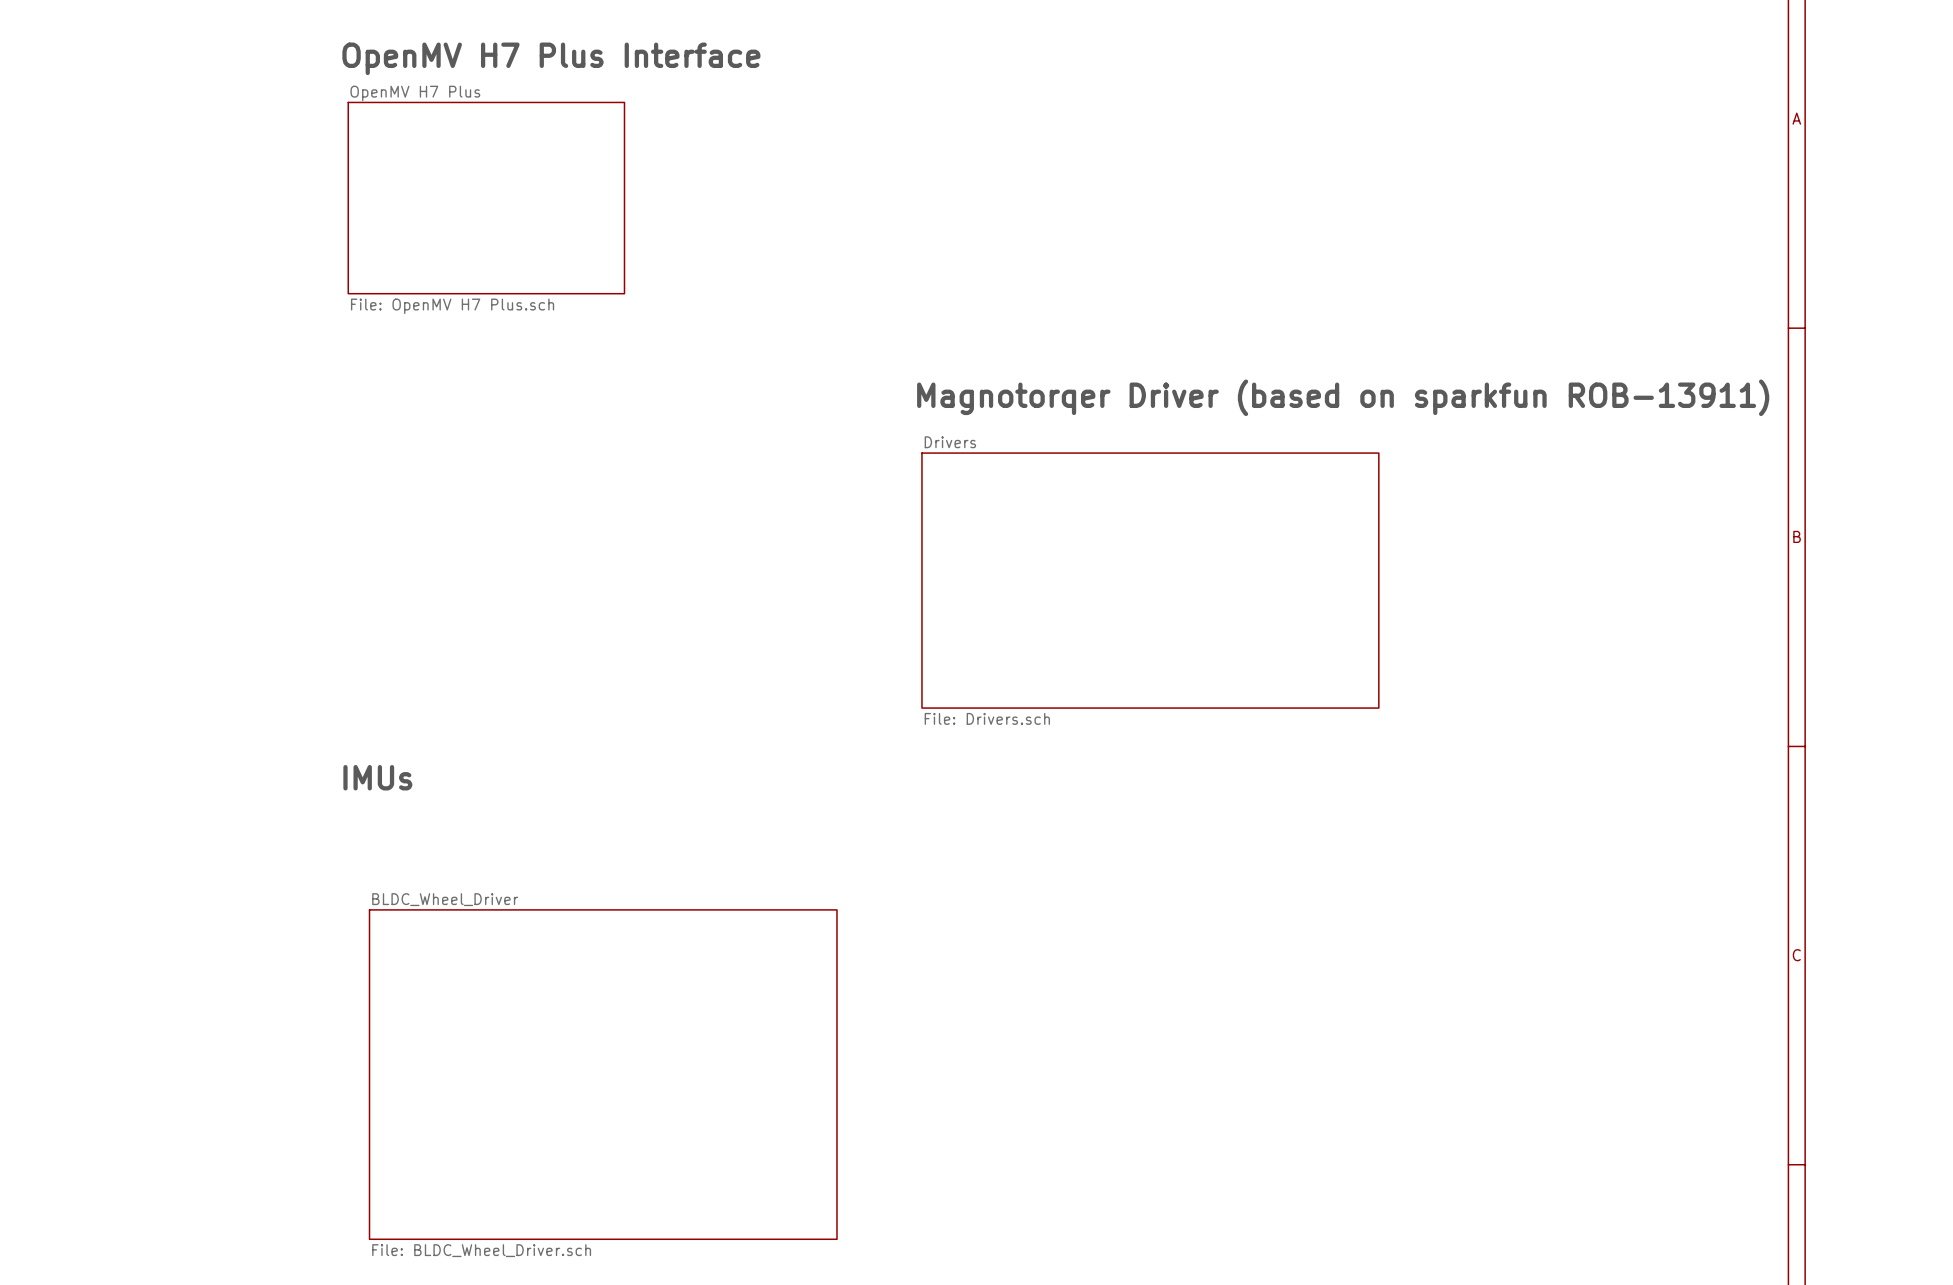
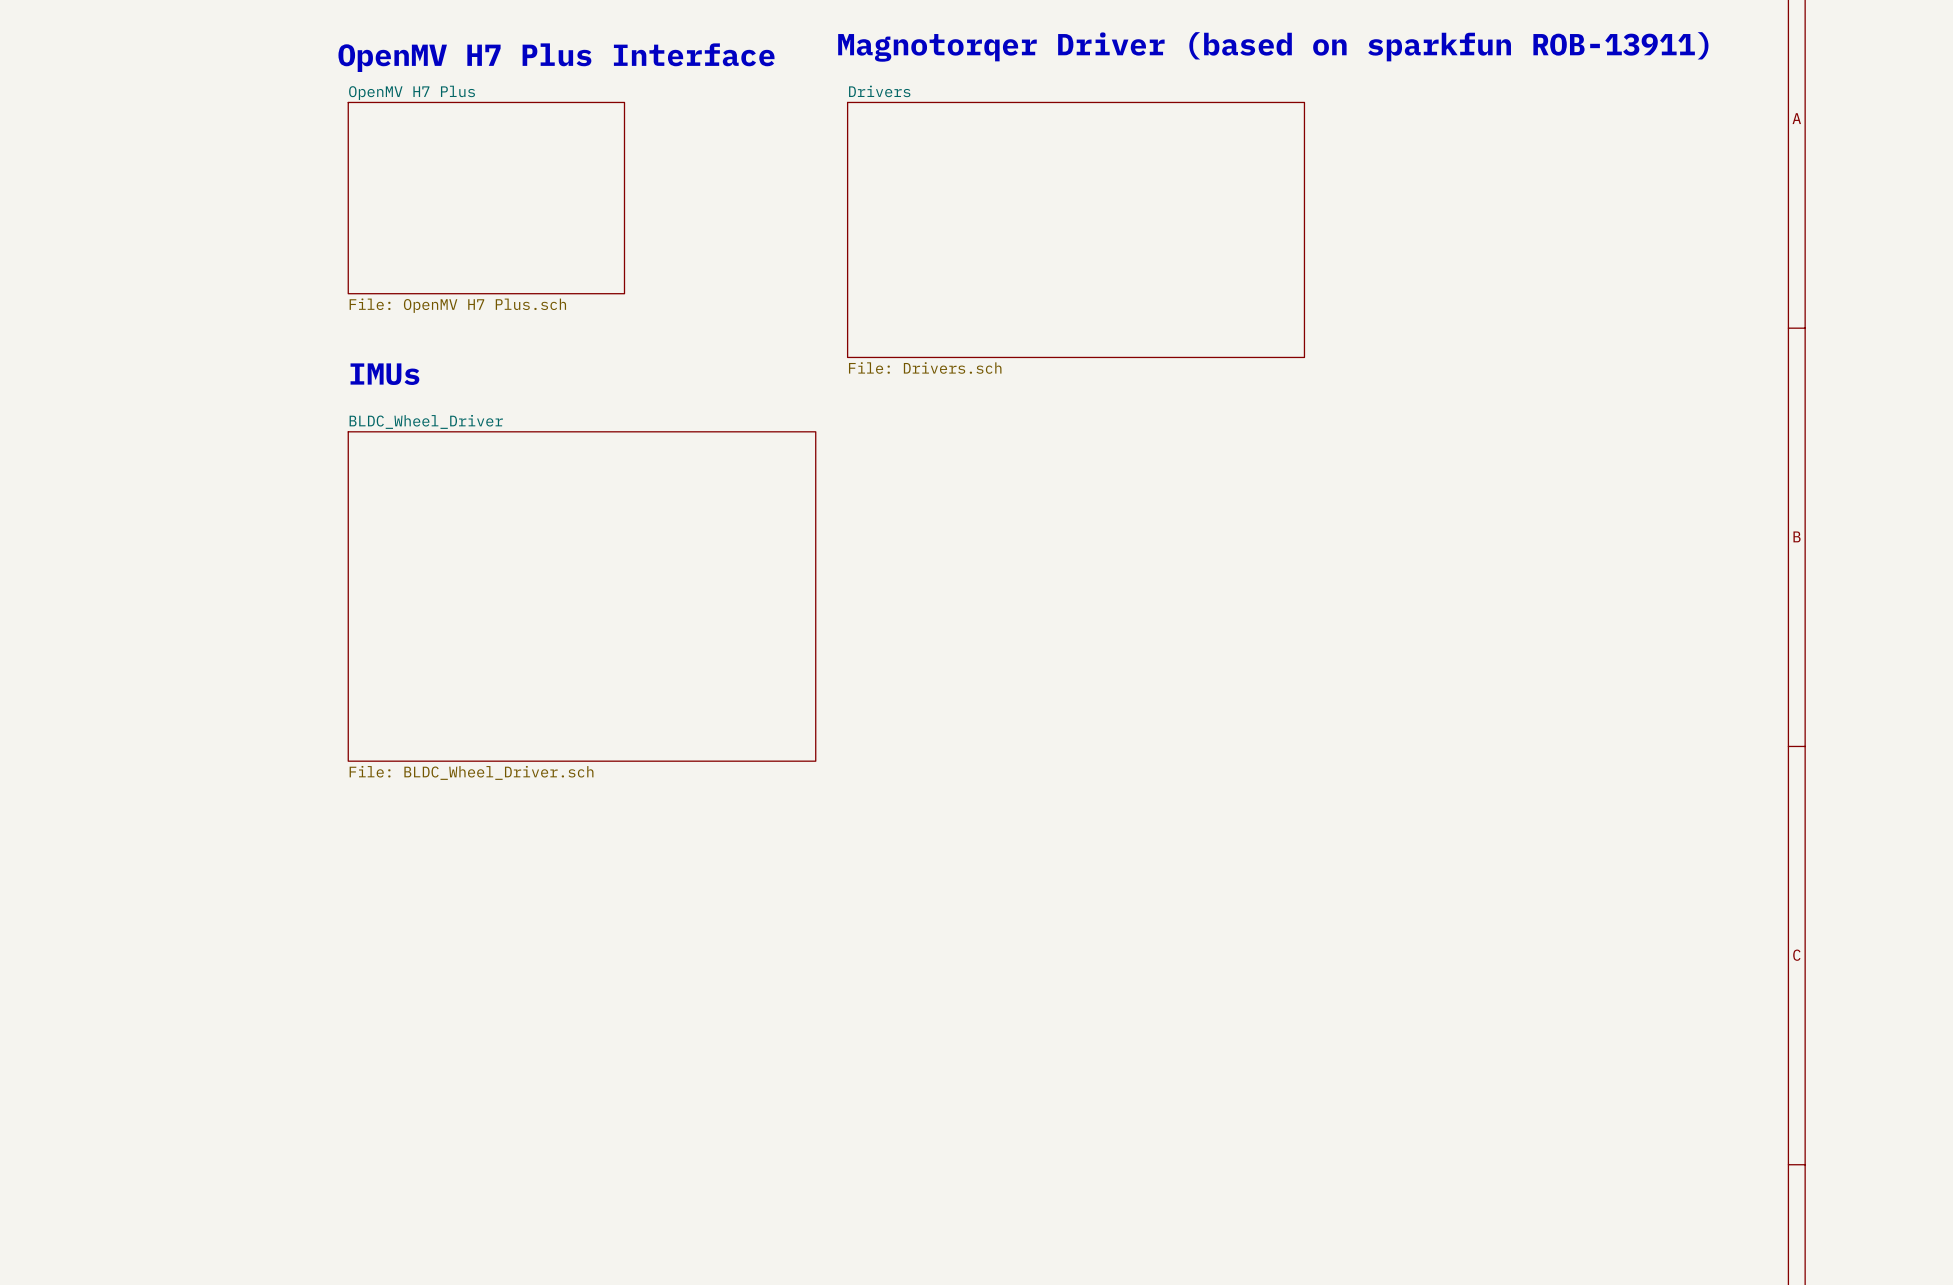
text: none -> Magnotorqer Driver (based on sparkfun ROB-13911) (1273, 46)
sheet Drivers: none -> File: Drivers.sch (1076, 229)
text: none -> IMUs (384, 374)
text: Magnotorqer Driver (based on sparkfun ROB-13911) (1343, 397) -> none
sheet Drivers: File: Drivers.sch (1150, 580) -> none
sheet BLDC_Wheel_Driver: none -> File: BLDC_Wheel_Driver.sch (581, 596)
text: IMUs (377, 777) -> none
sheet BLDC_Wheel_Driver: File: BLDC_Wheel_Driver.sch (603, 1074) -> none

